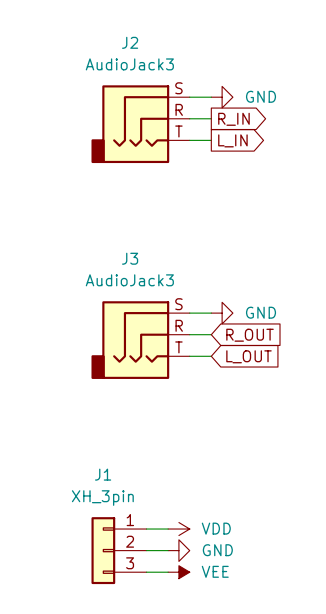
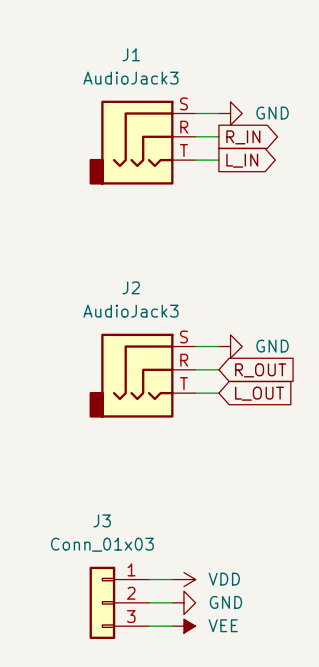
J2 name: J2 (130, 42) -> J1 (131, 54)
J3 name: J3 (130, 258) -> J2 (131, 287)
J1 name: J1 (103, 474) -> J3 (102, 520)
J1 value: XH_3pin (102, 498) -> Conn_01x03 (102, 544)

